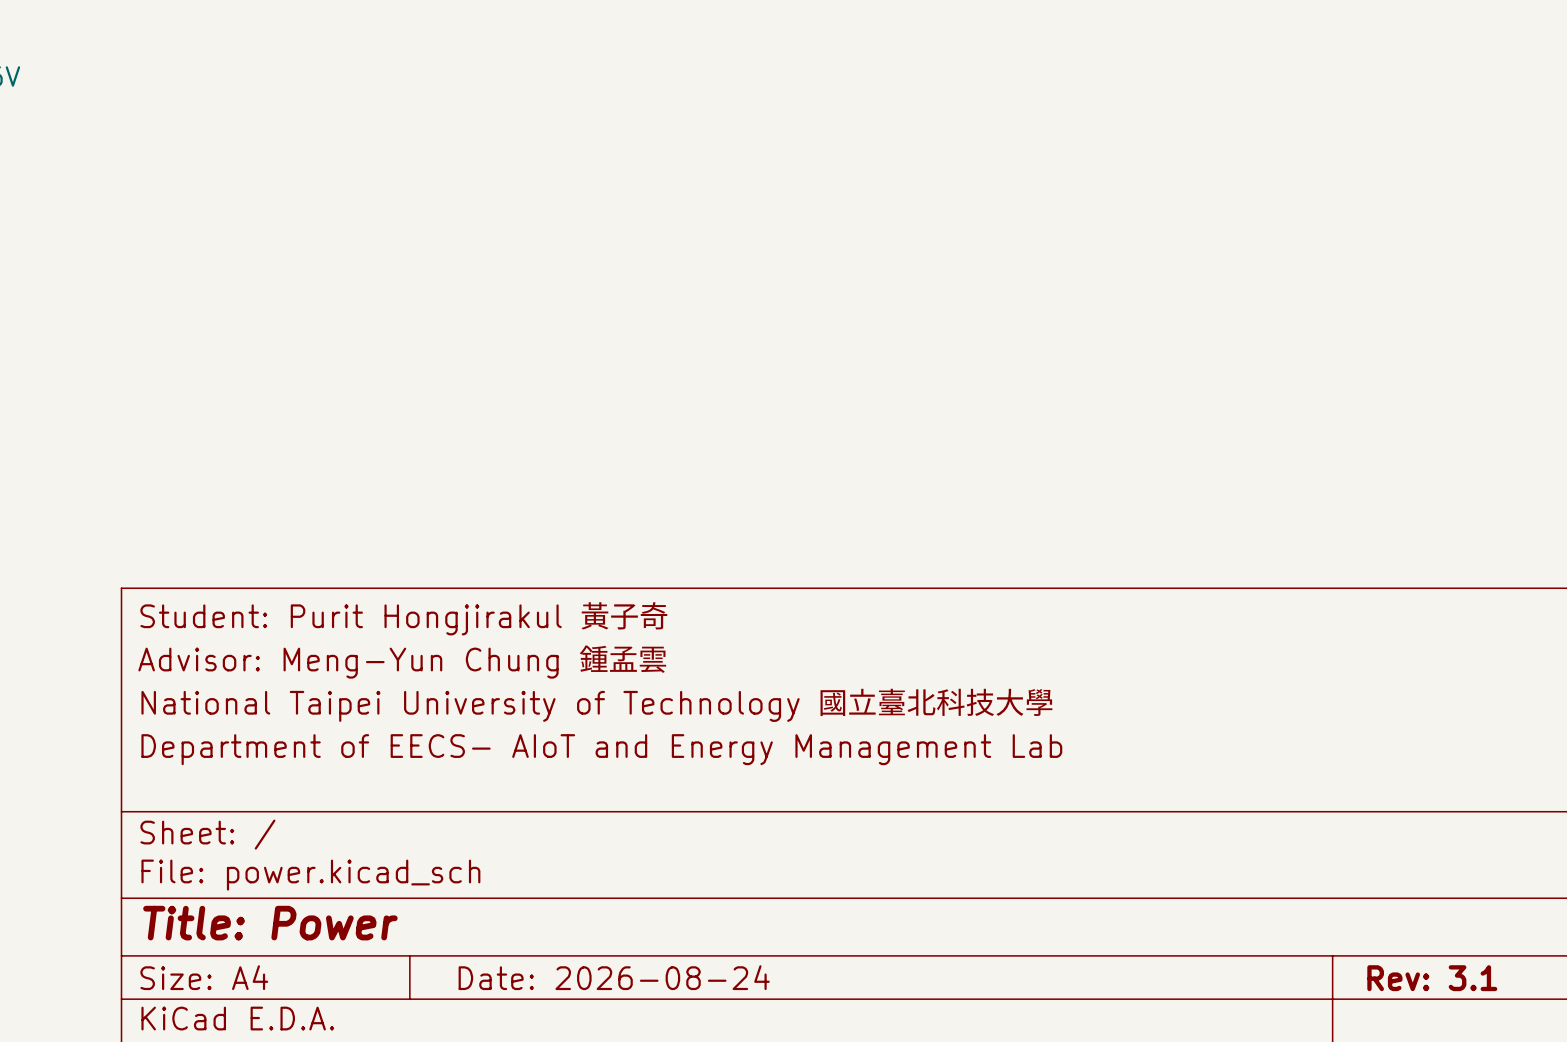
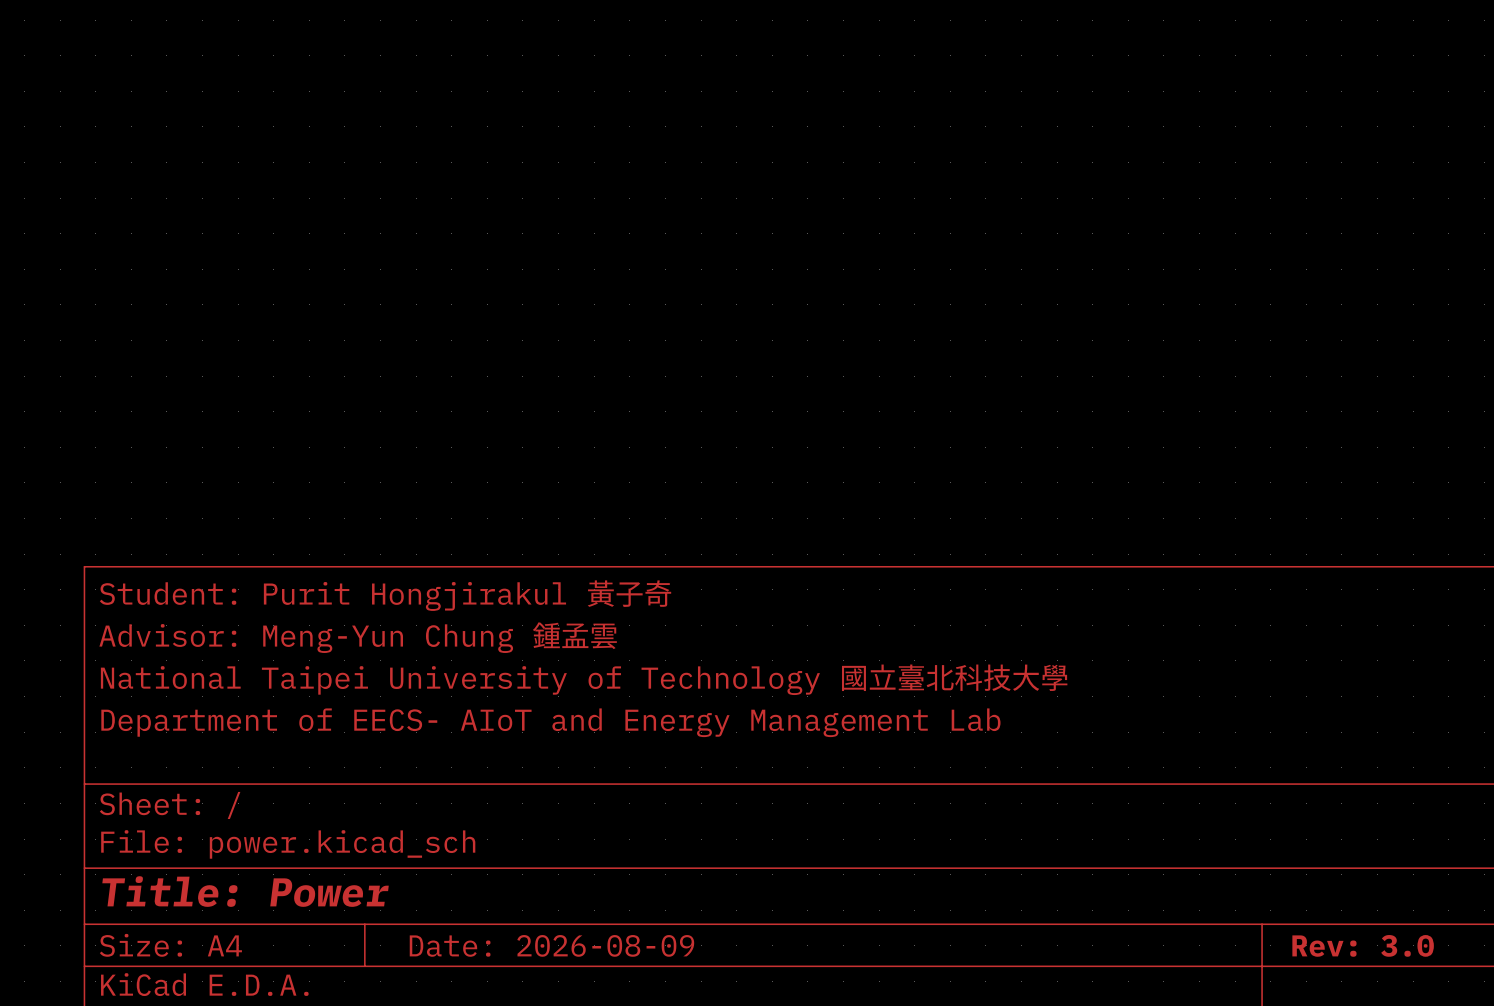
title block: Date: 2026-08-24 (614, 977) -> Date: 2026-08-09 (551, 945)
title block: Rev: 3.1 (1432, 978) -> Rev: 3.0 (1363, 945)

